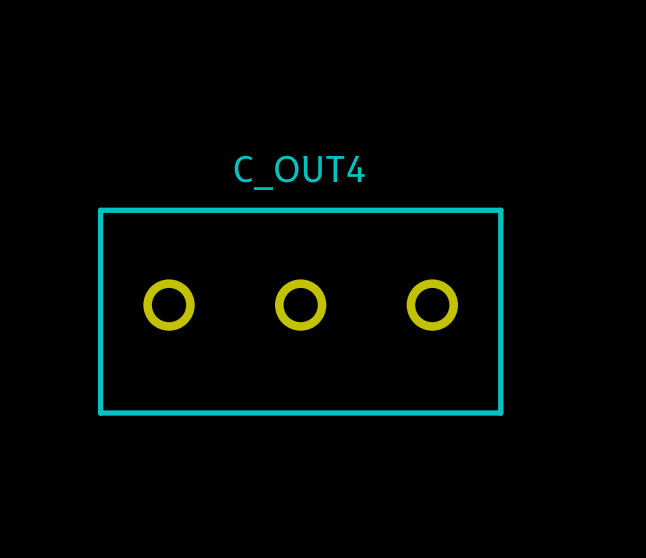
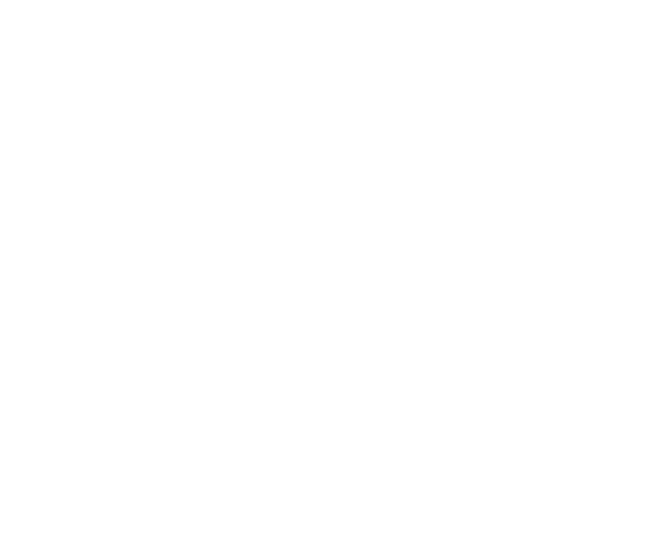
C_OUT4: (300, 311) -> none

